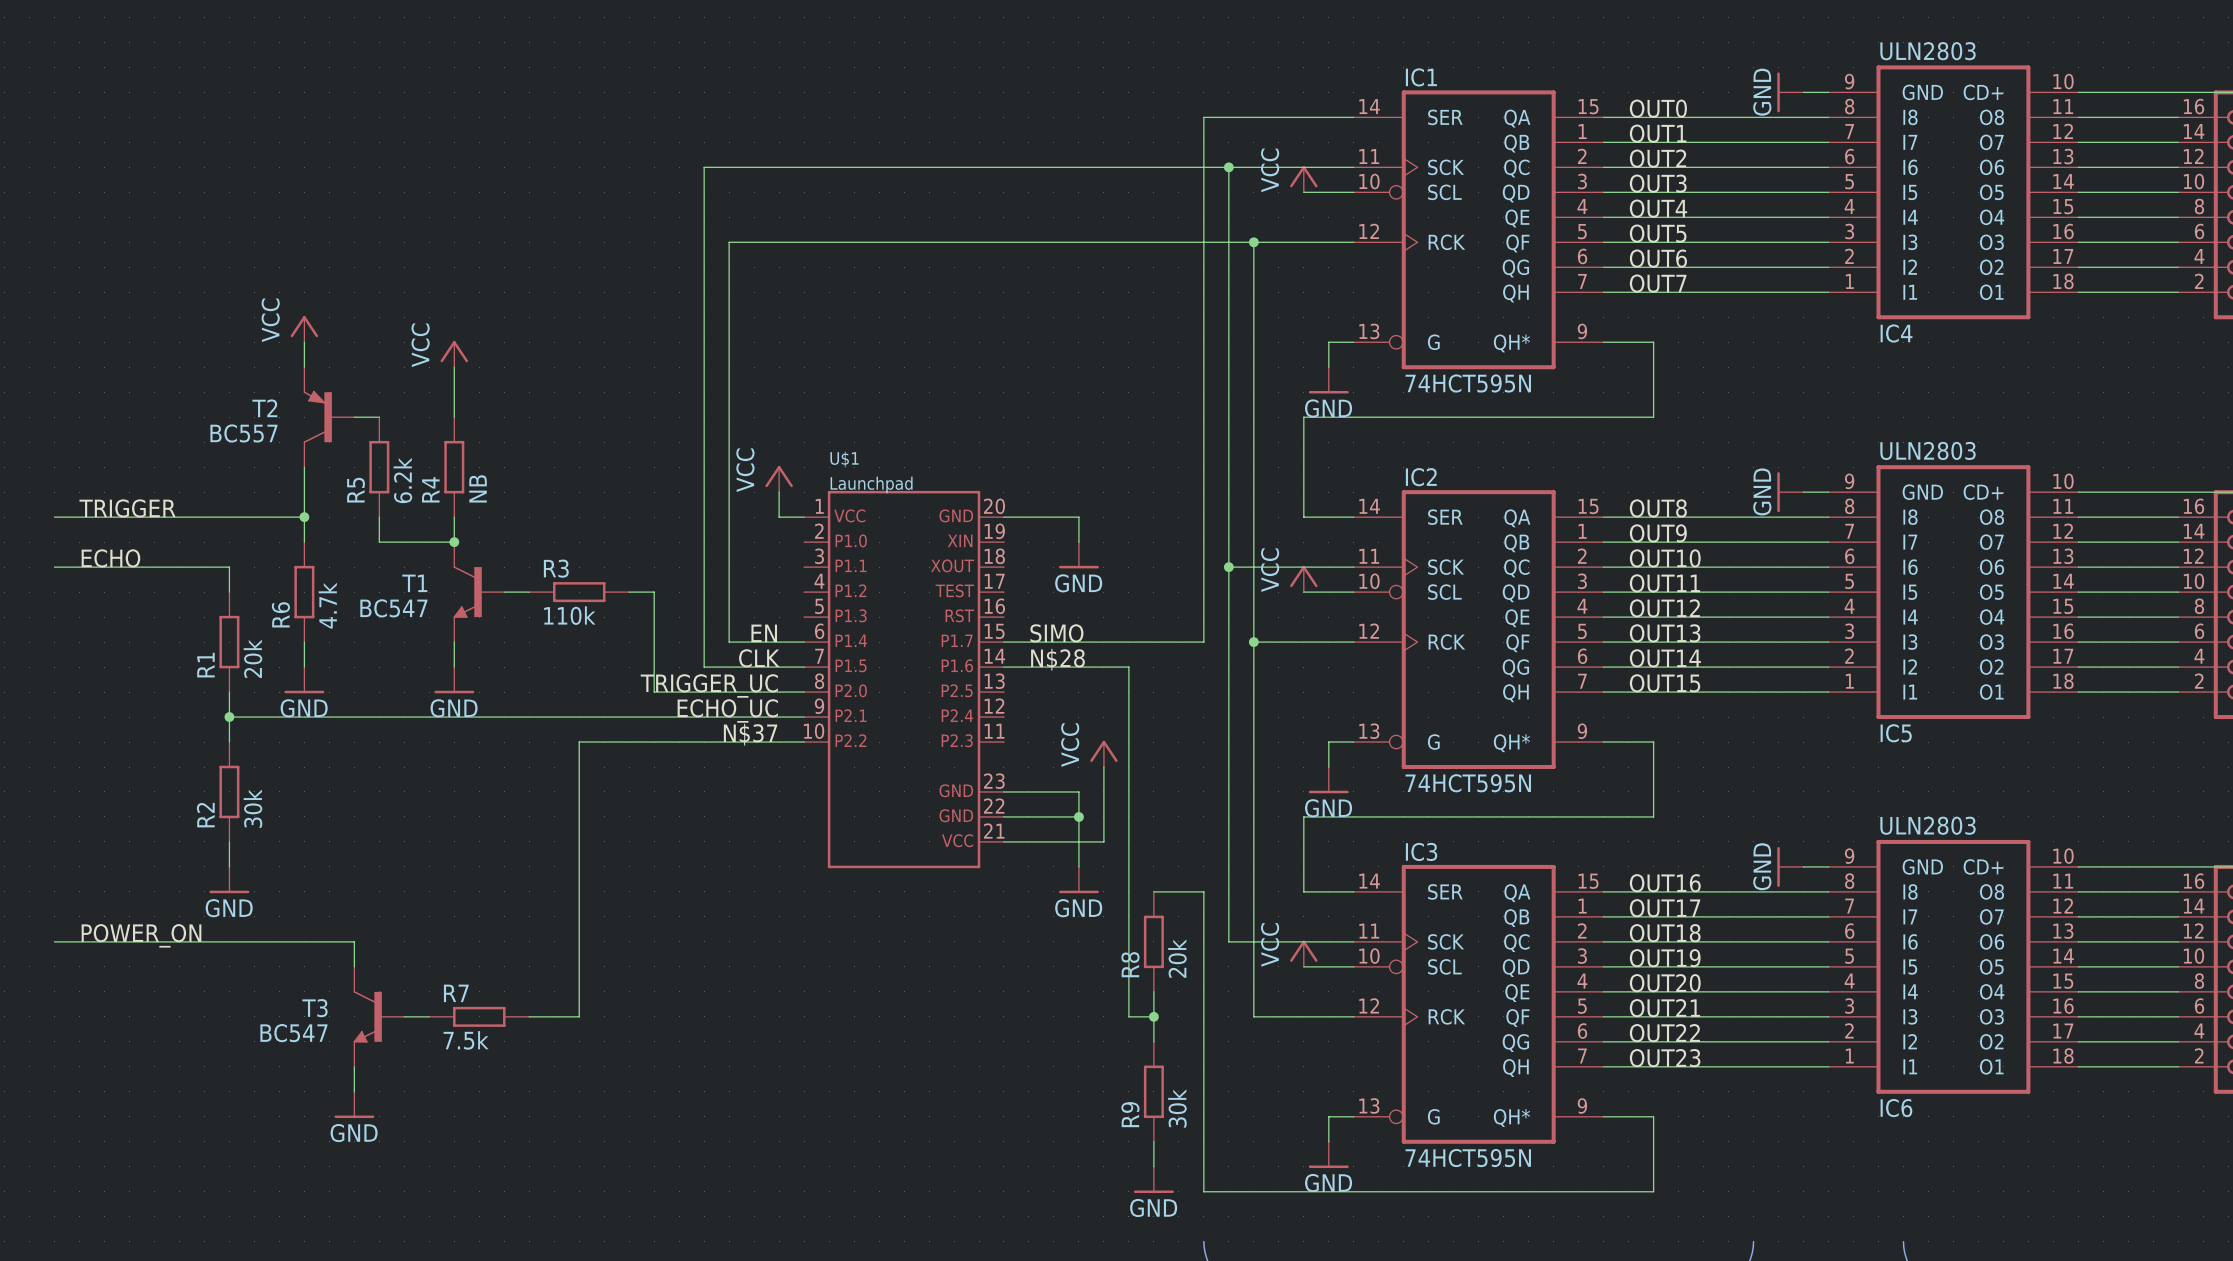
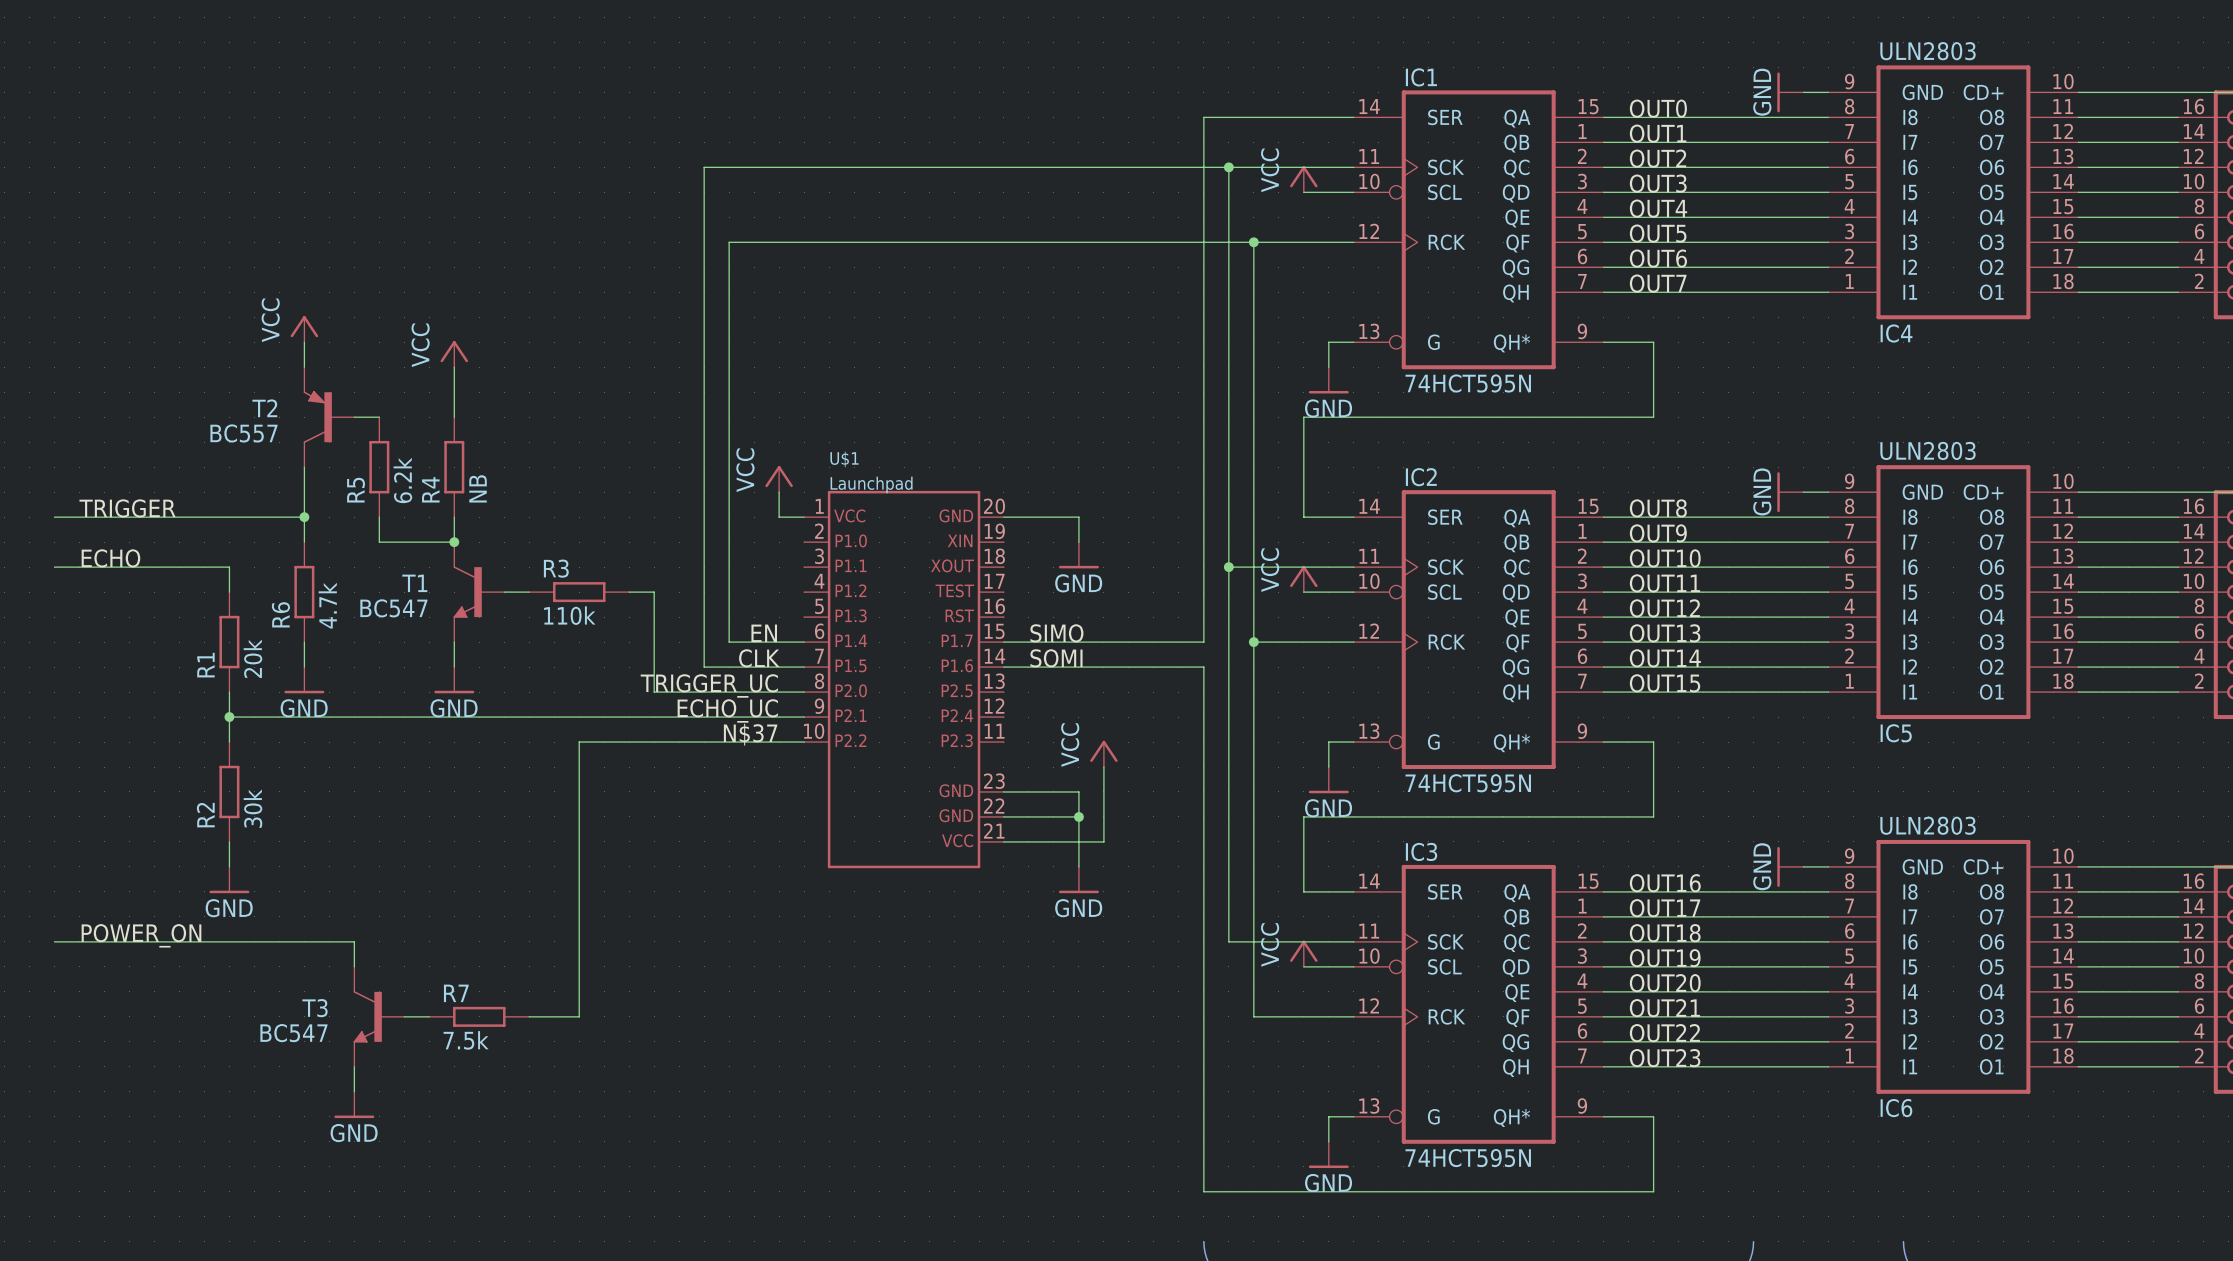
label: N$28 (1057, 659) -> SOMI (1056, 658)
wire: (1128, 667) (1128, 1016) (1153, 1016) -> (1128, 667) (1203, 667) (1203, 891)
wire: (1153, 891) (1203, 891) -> none
R8: 20k (1153, 941) -> none
wire: (1153, 991) (1153, 1041) -> none
junction: (1153, 1016) -> none
R9: 30k (1153, 1091) -> none
wire: (1153, 1141) (1153, 1166) -> none
power symbol: GND (1153, 1179) -> none

